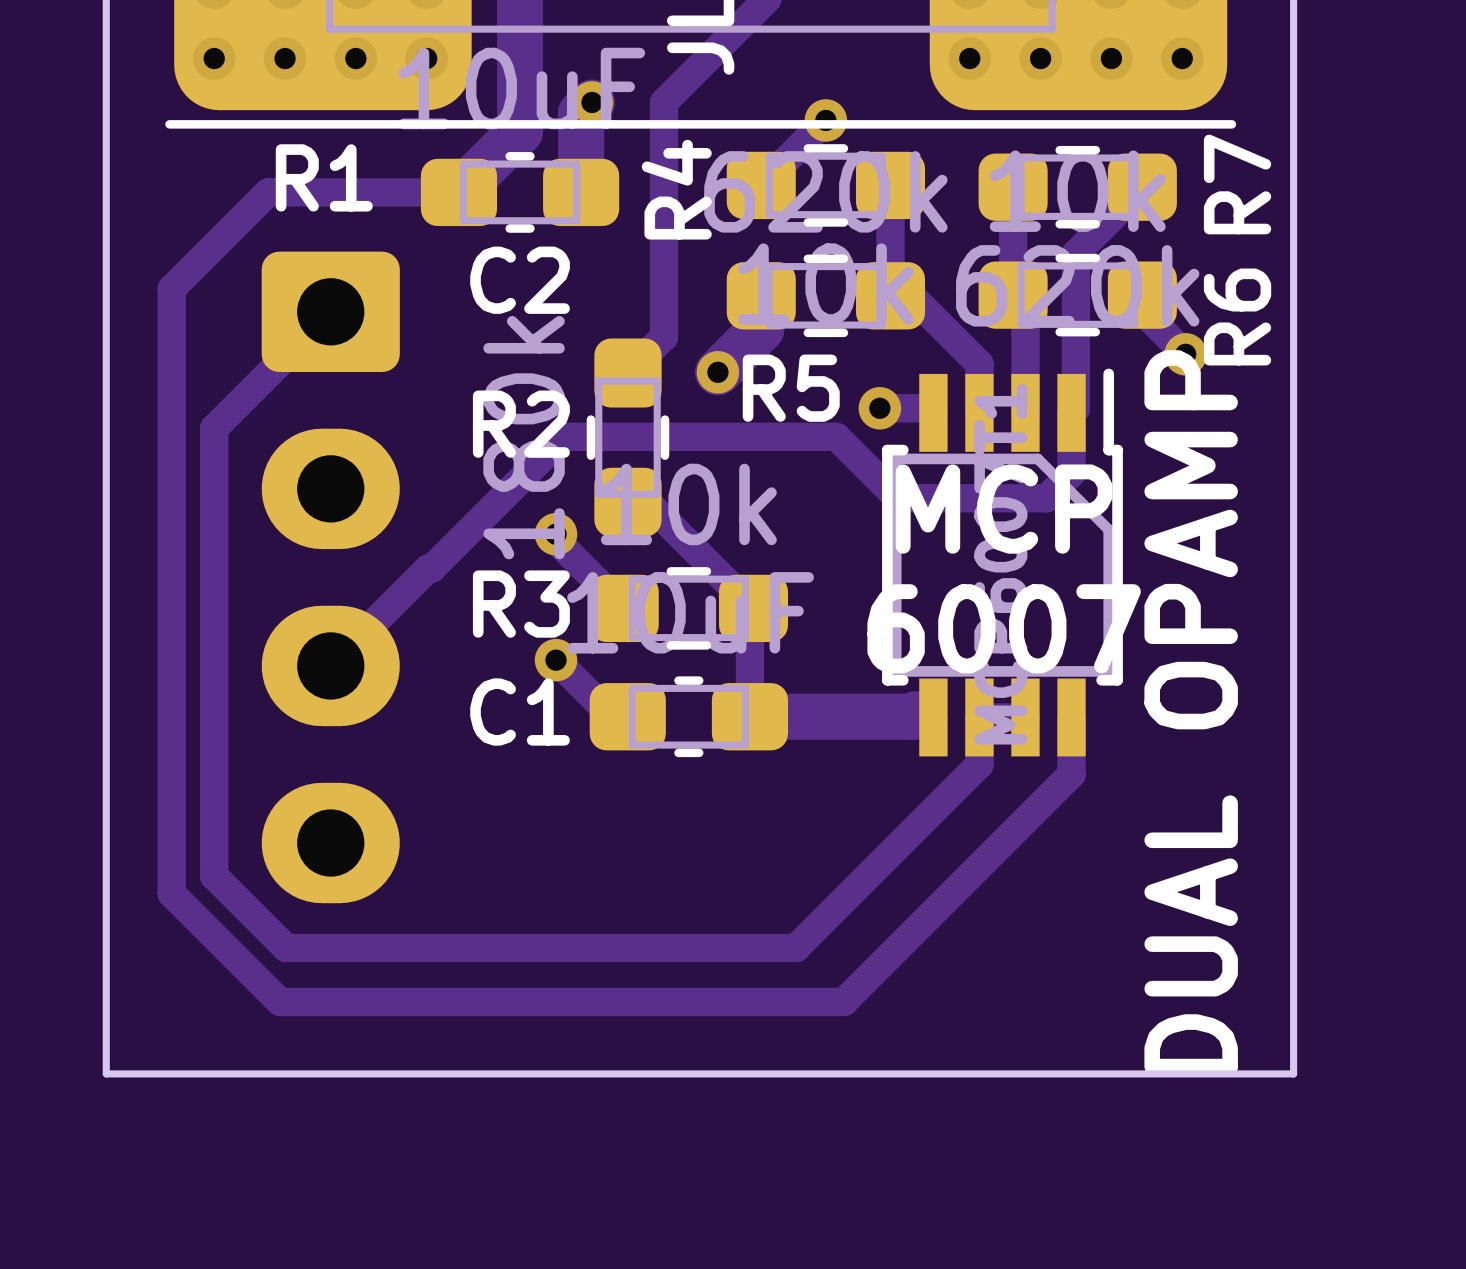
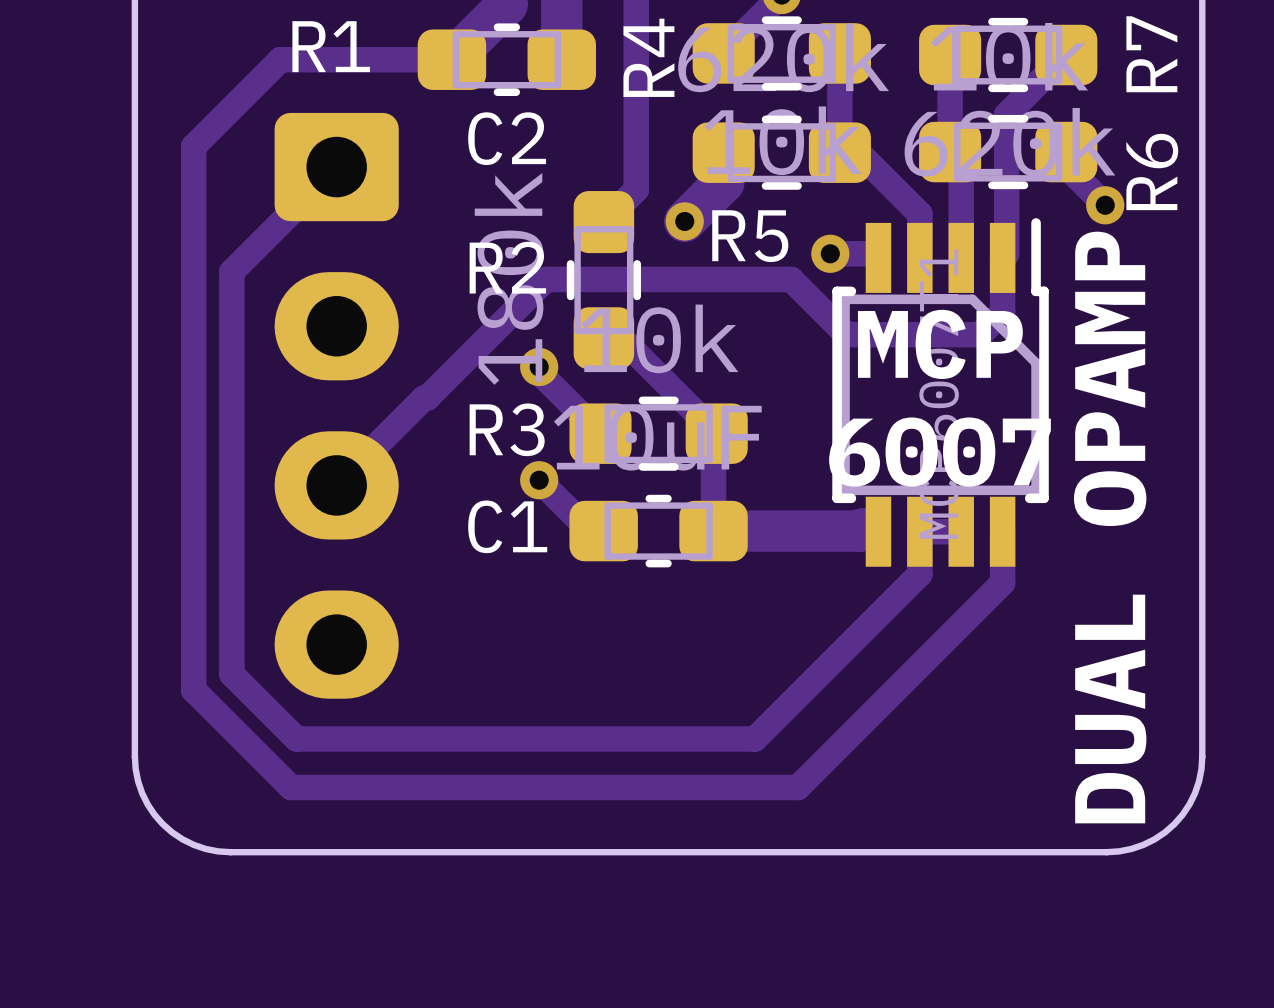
board edge: (106, 967) (106, 1073) (212, 1073) -> (134, 756) (135, 769) (142, 793) (154, 814) (162, 824) (172, 832) (193, 844) (217, 851) (230, 852)
board edge: (1293, 967) (1293, 1073) (1187, 1073) -> (1202, 756) (1201, 769) (1195, 793) (1182, 814) (1174, 824) (1154, 839) (1143, 844) (1119, 851) (1106, 852)

